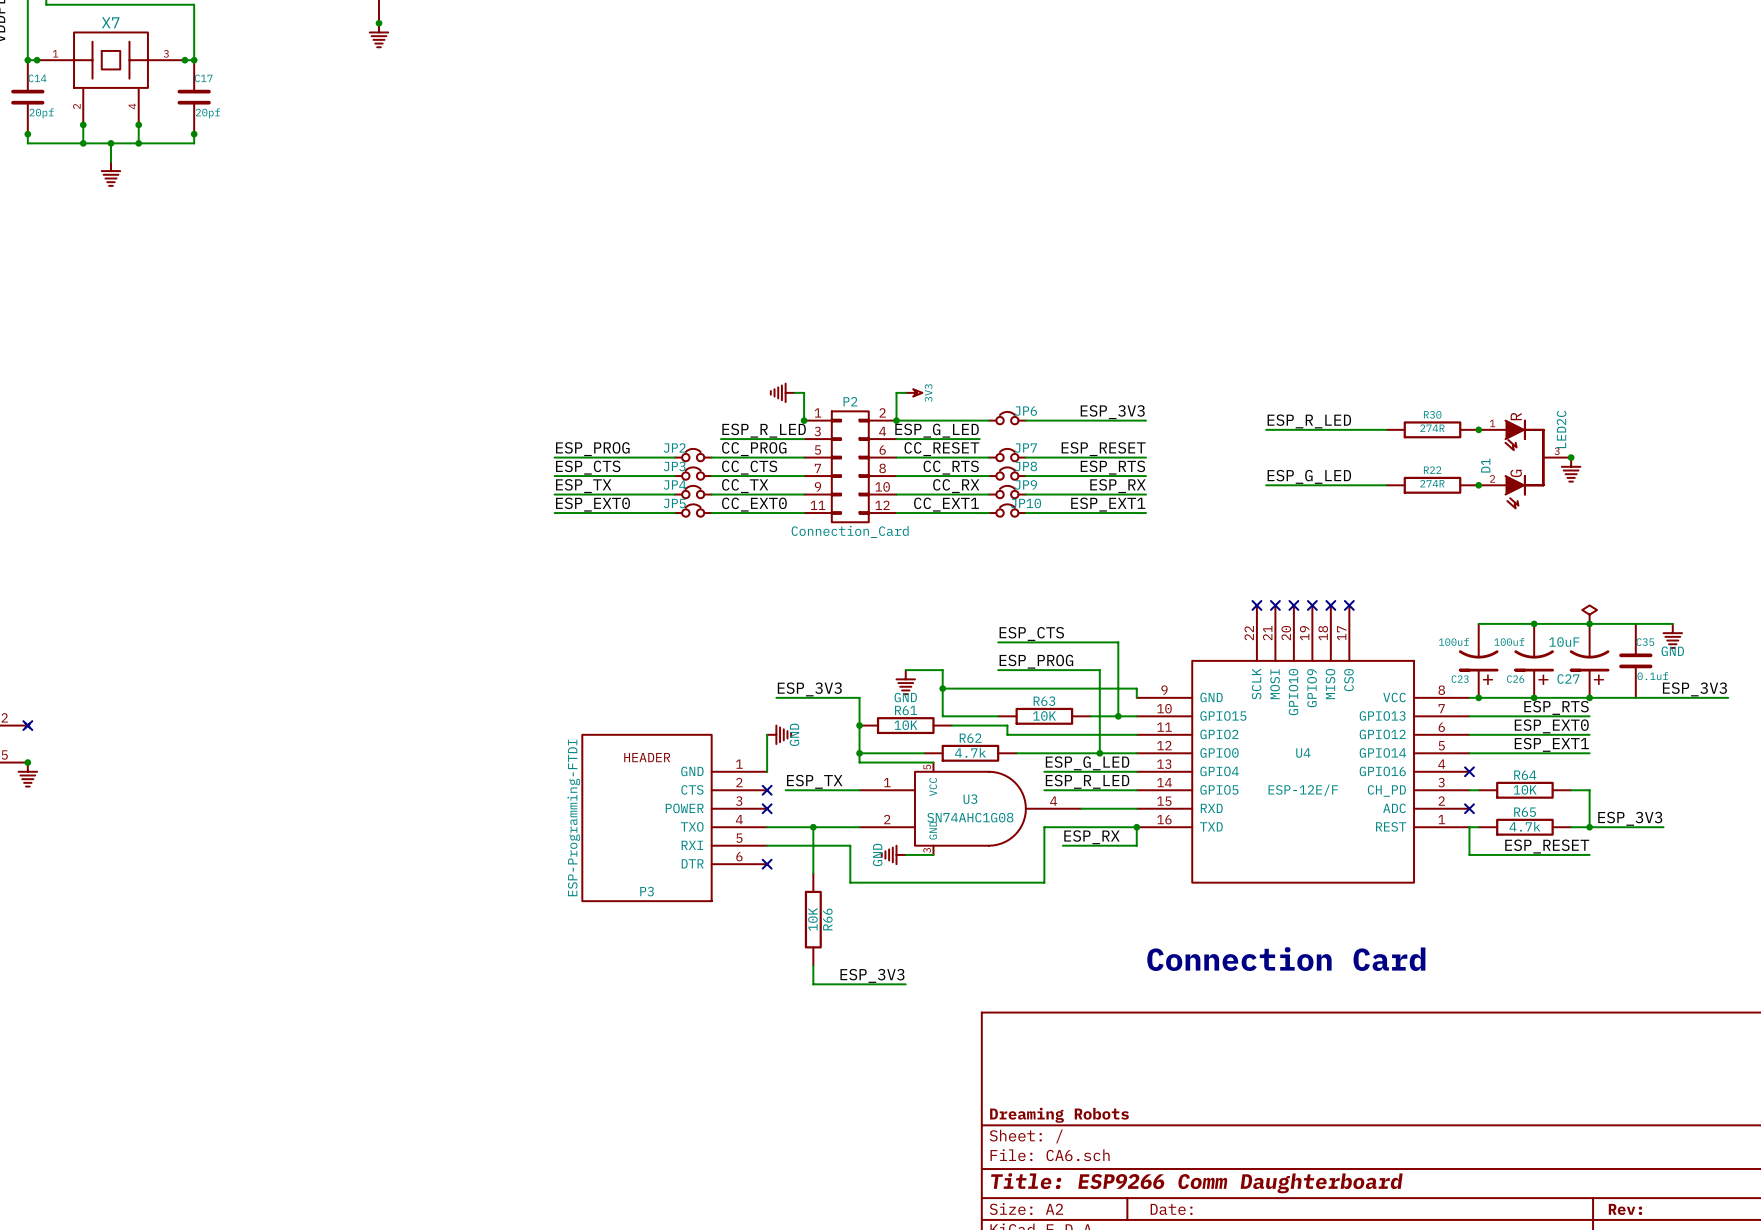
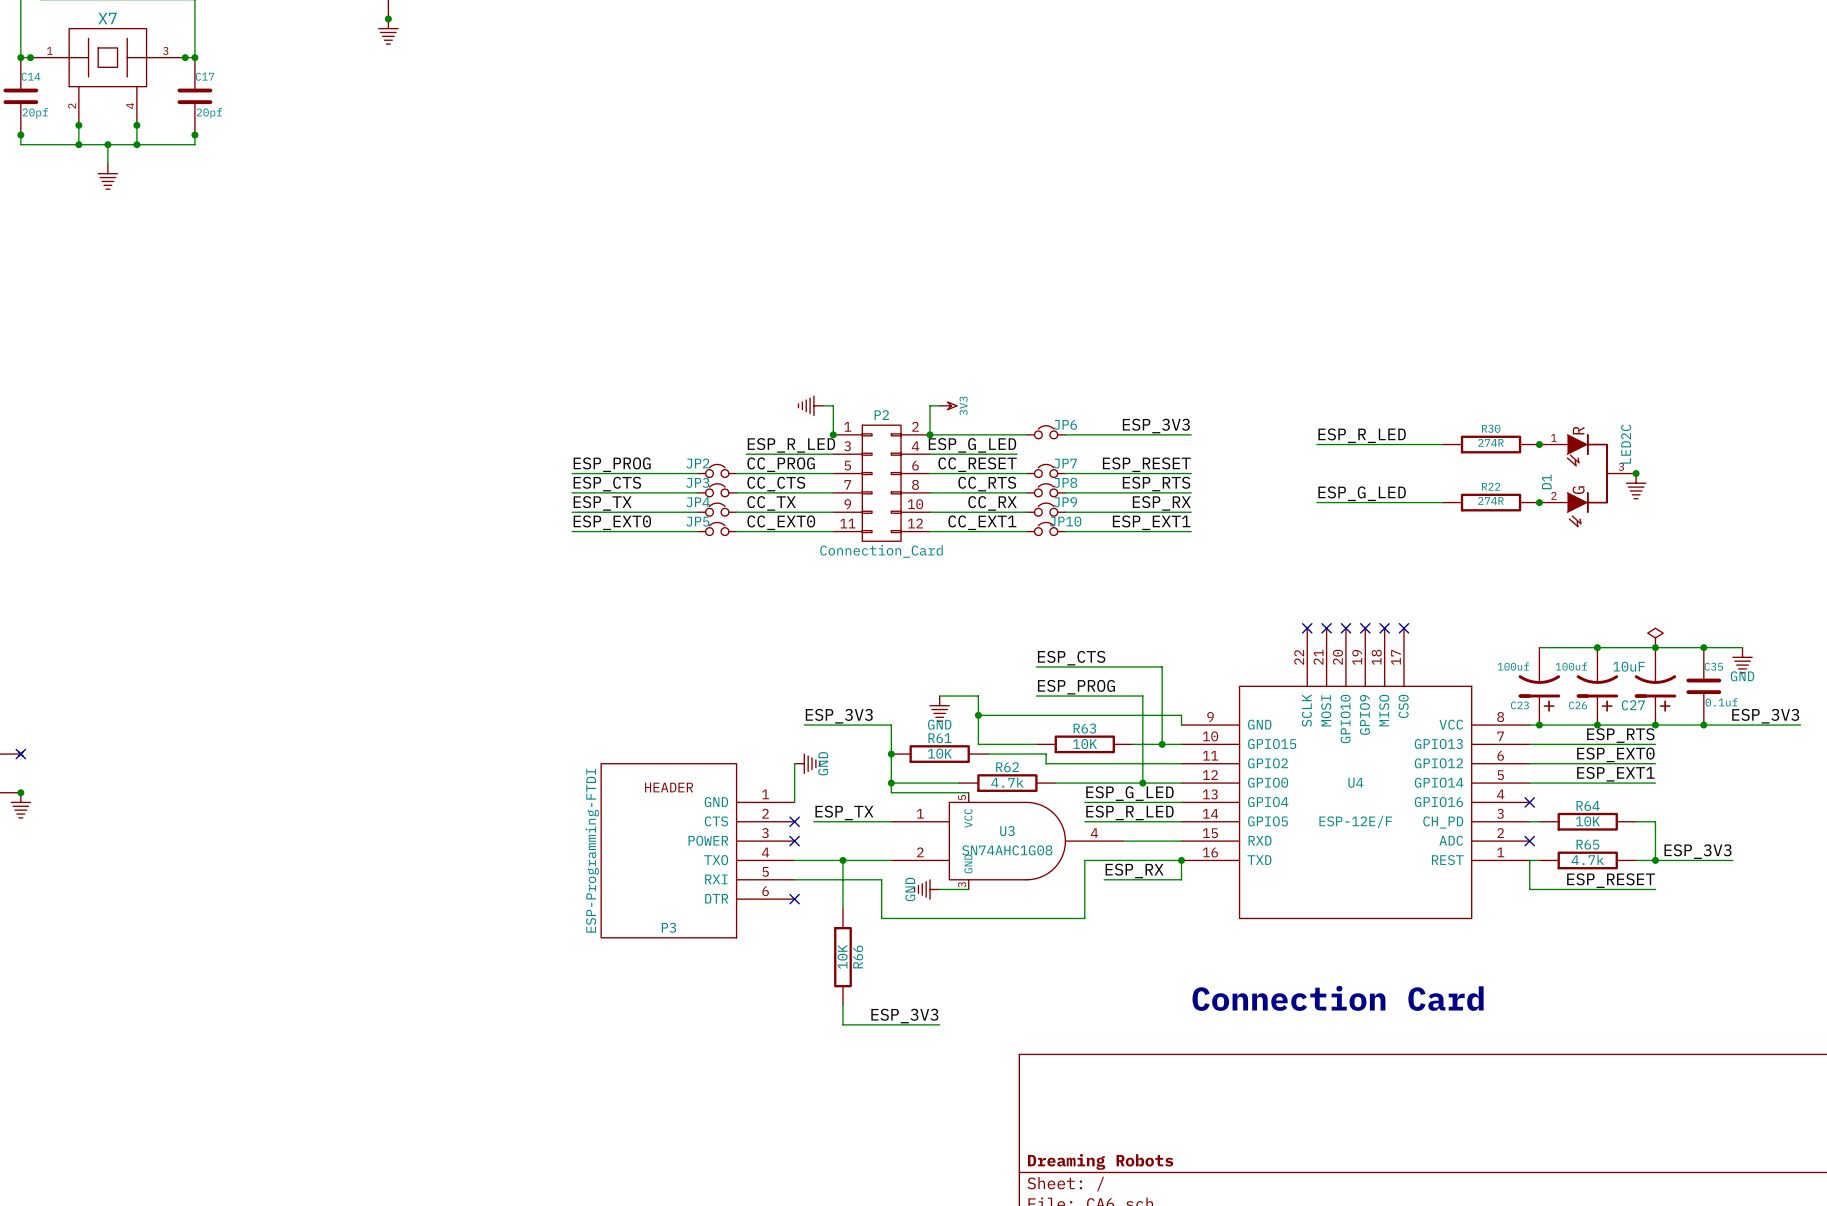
junction: none -> (1703, 647)
junction: none -> (1703, 725)

